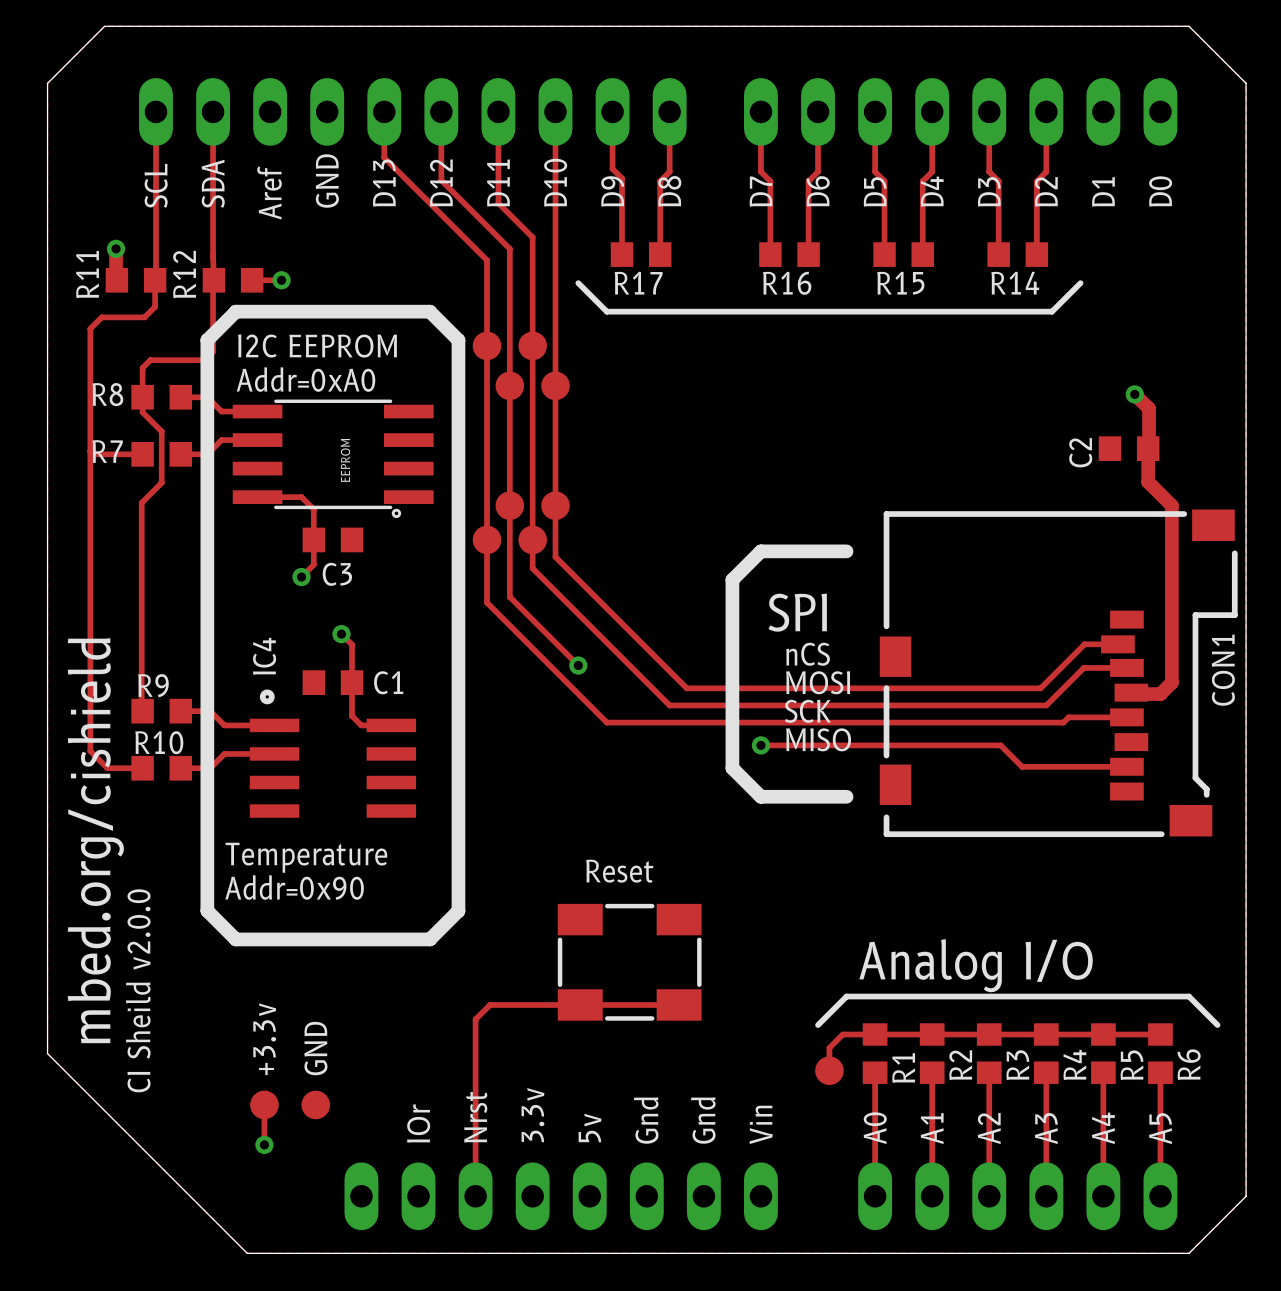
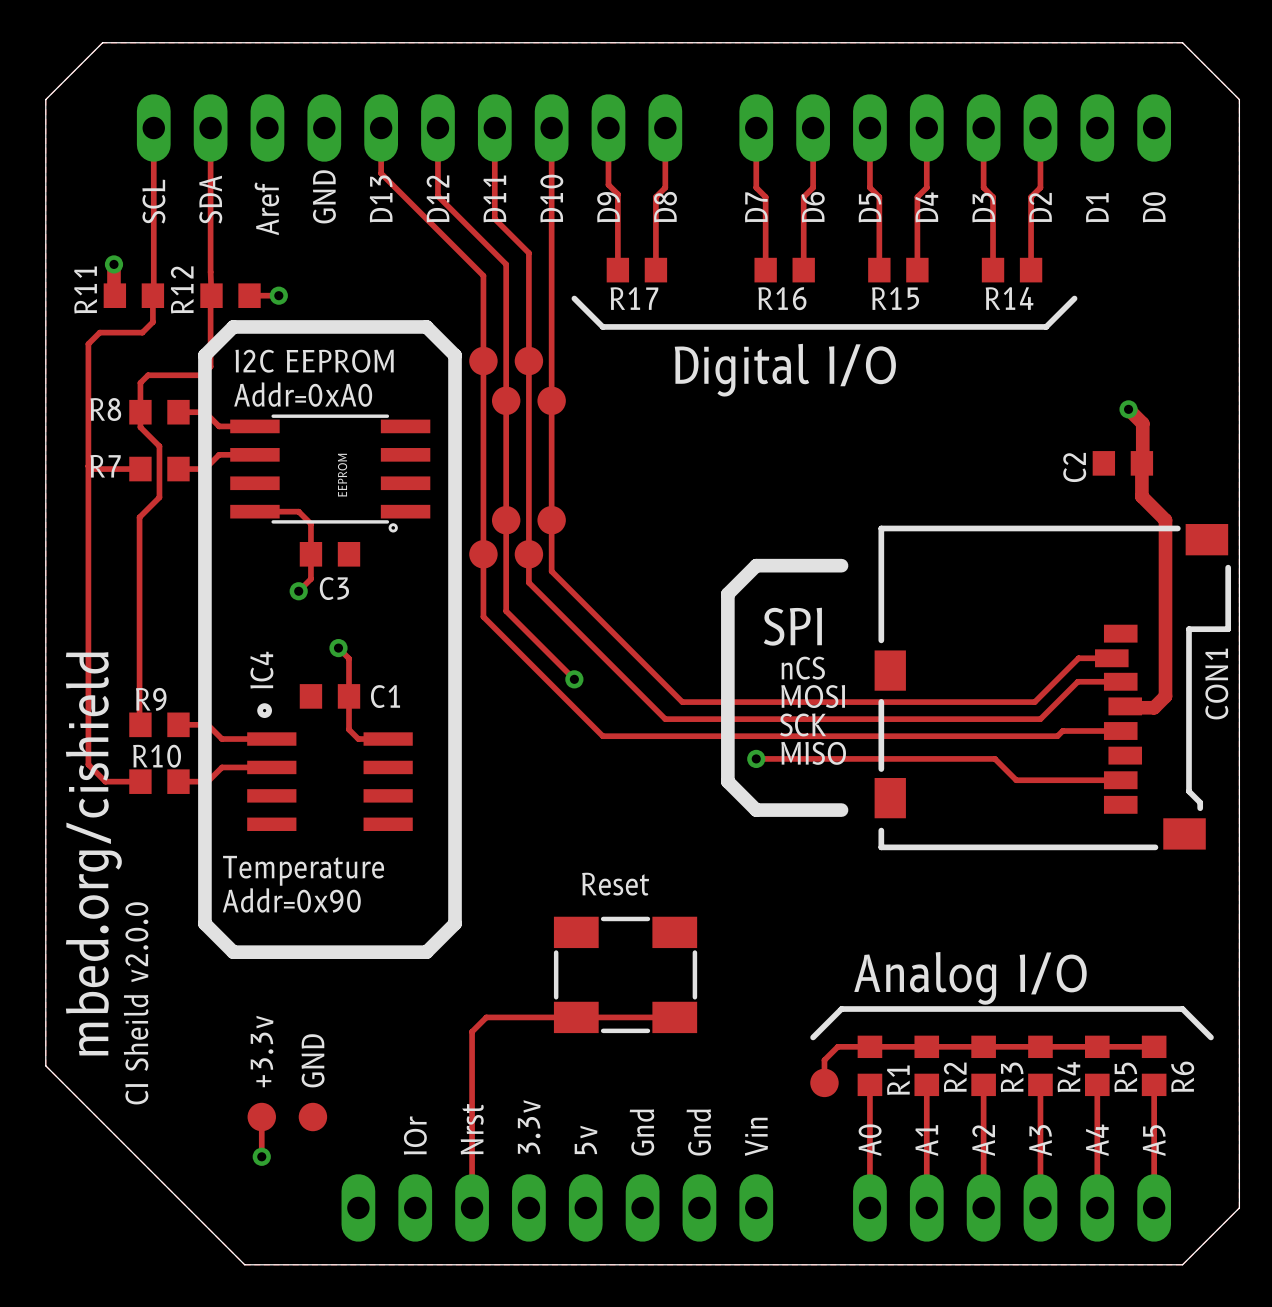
text: none -> Digital I/O (785, 370)

